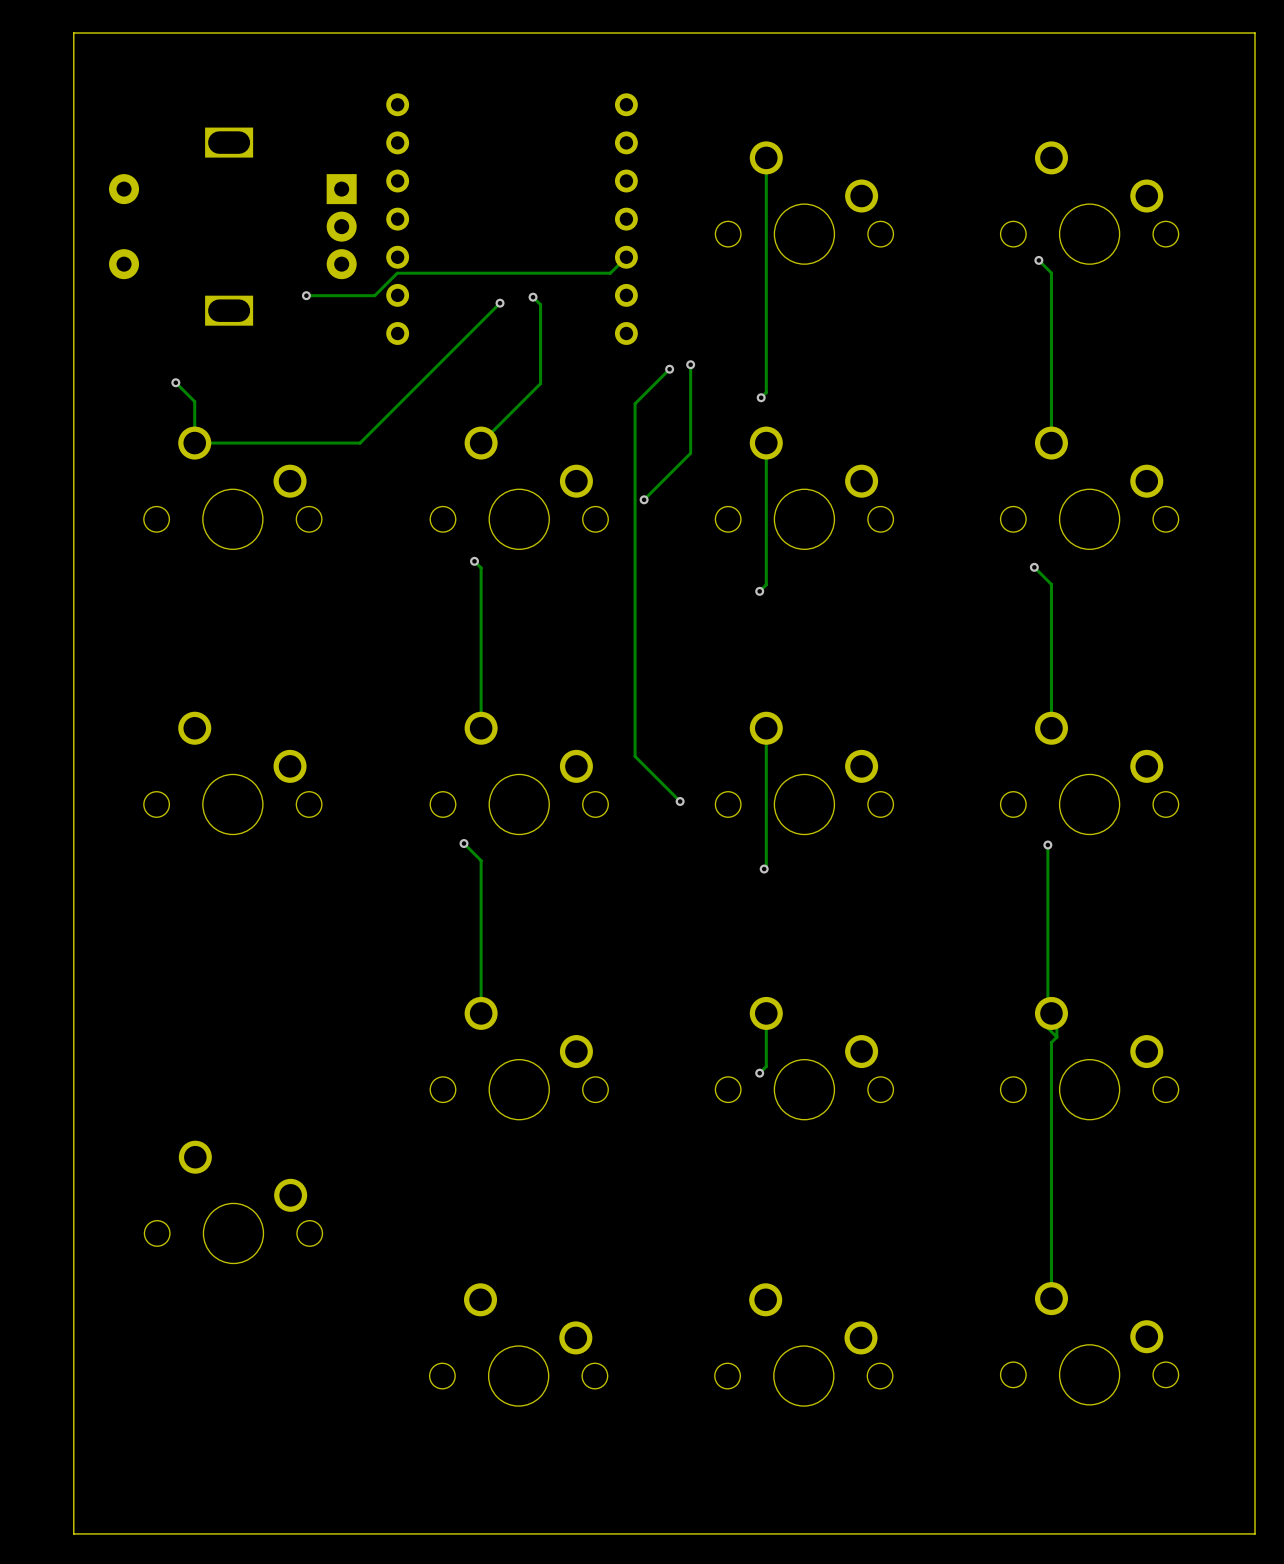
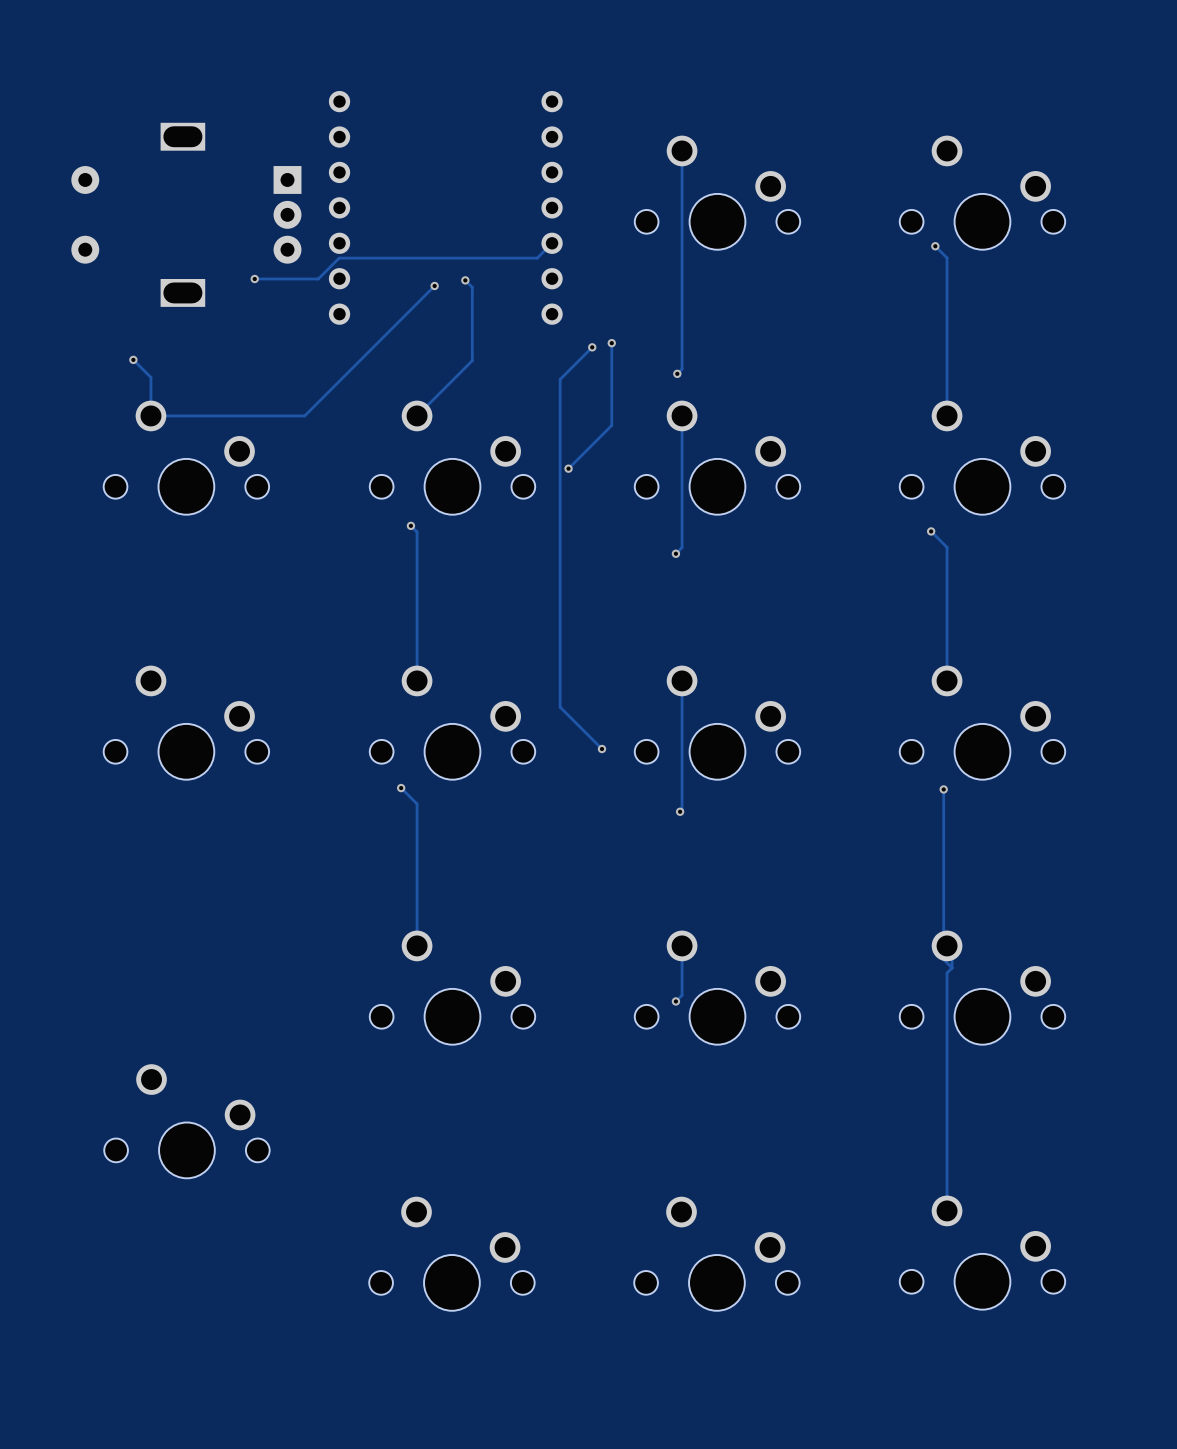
board edge: (1255, 33) (73, 33) (73, 1533) (1255, 1533) (1255, 33) -> none

